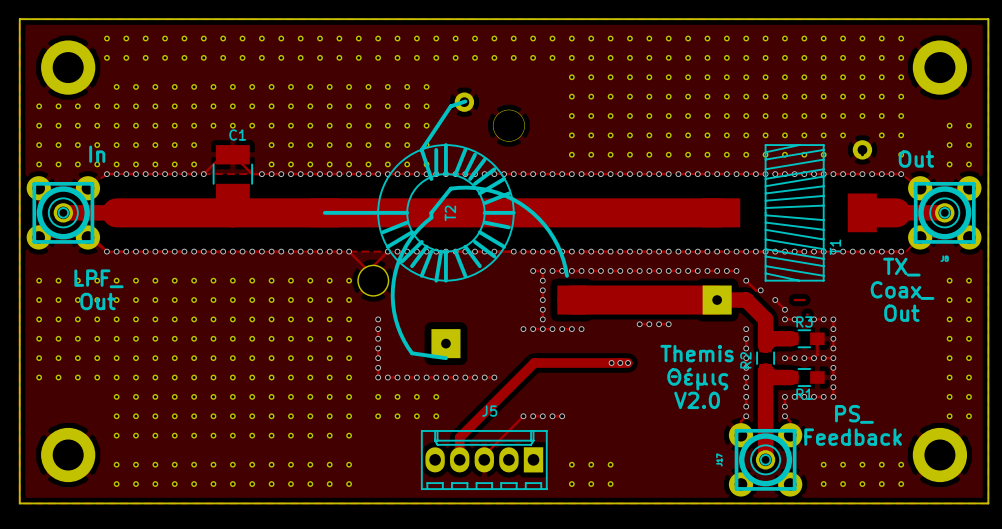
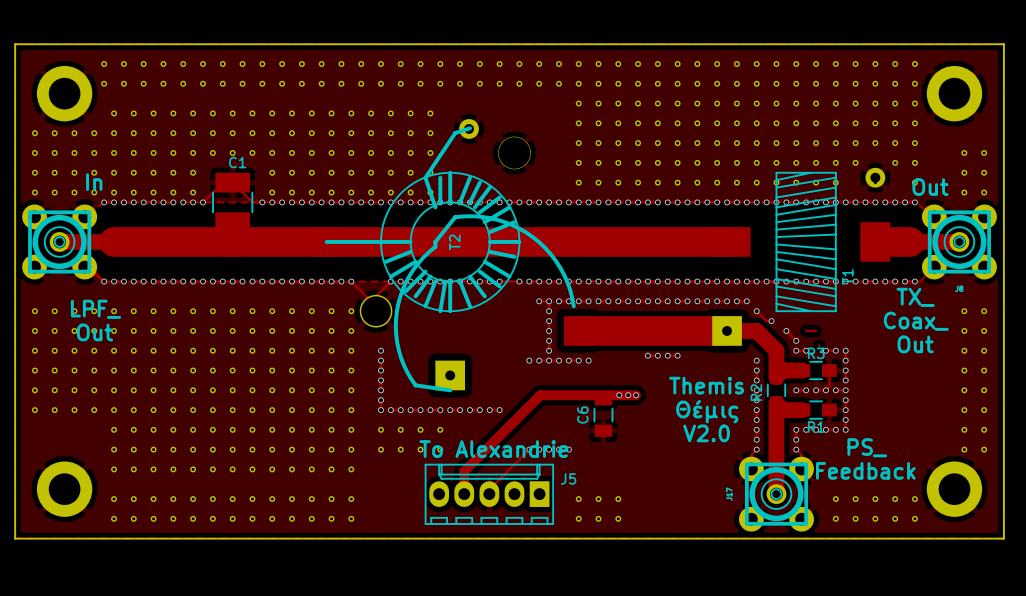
C6: none -> (603, 415)
J5 name position: J5 (489, 411) -> J5 (568, 478)
text: none -> To Alexandrie (493, 449)

